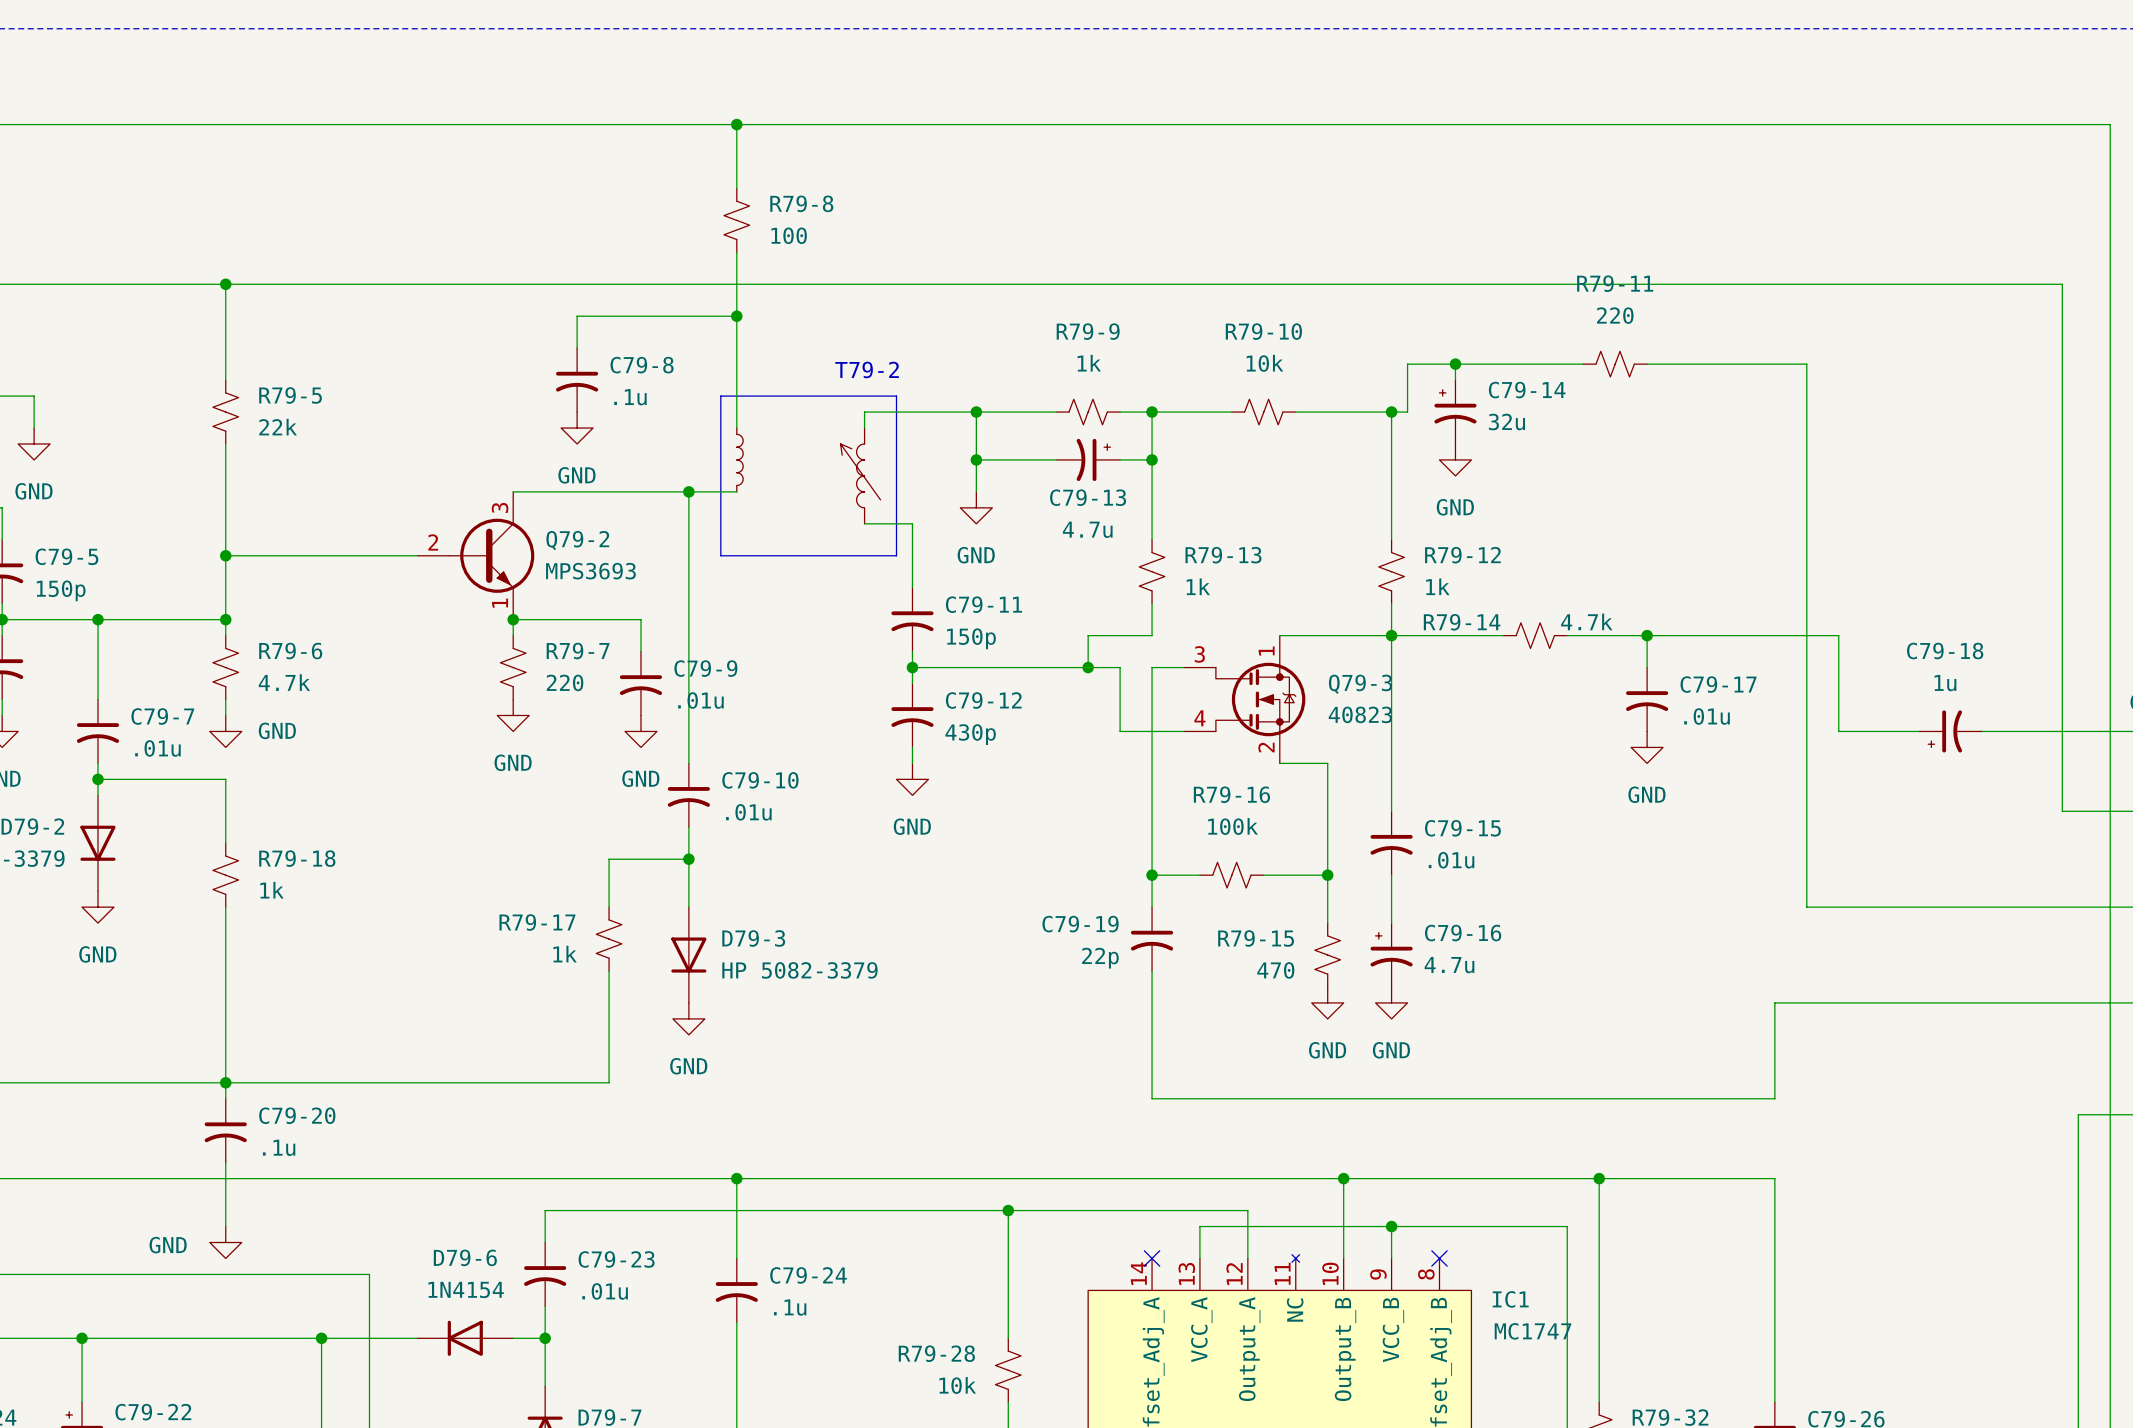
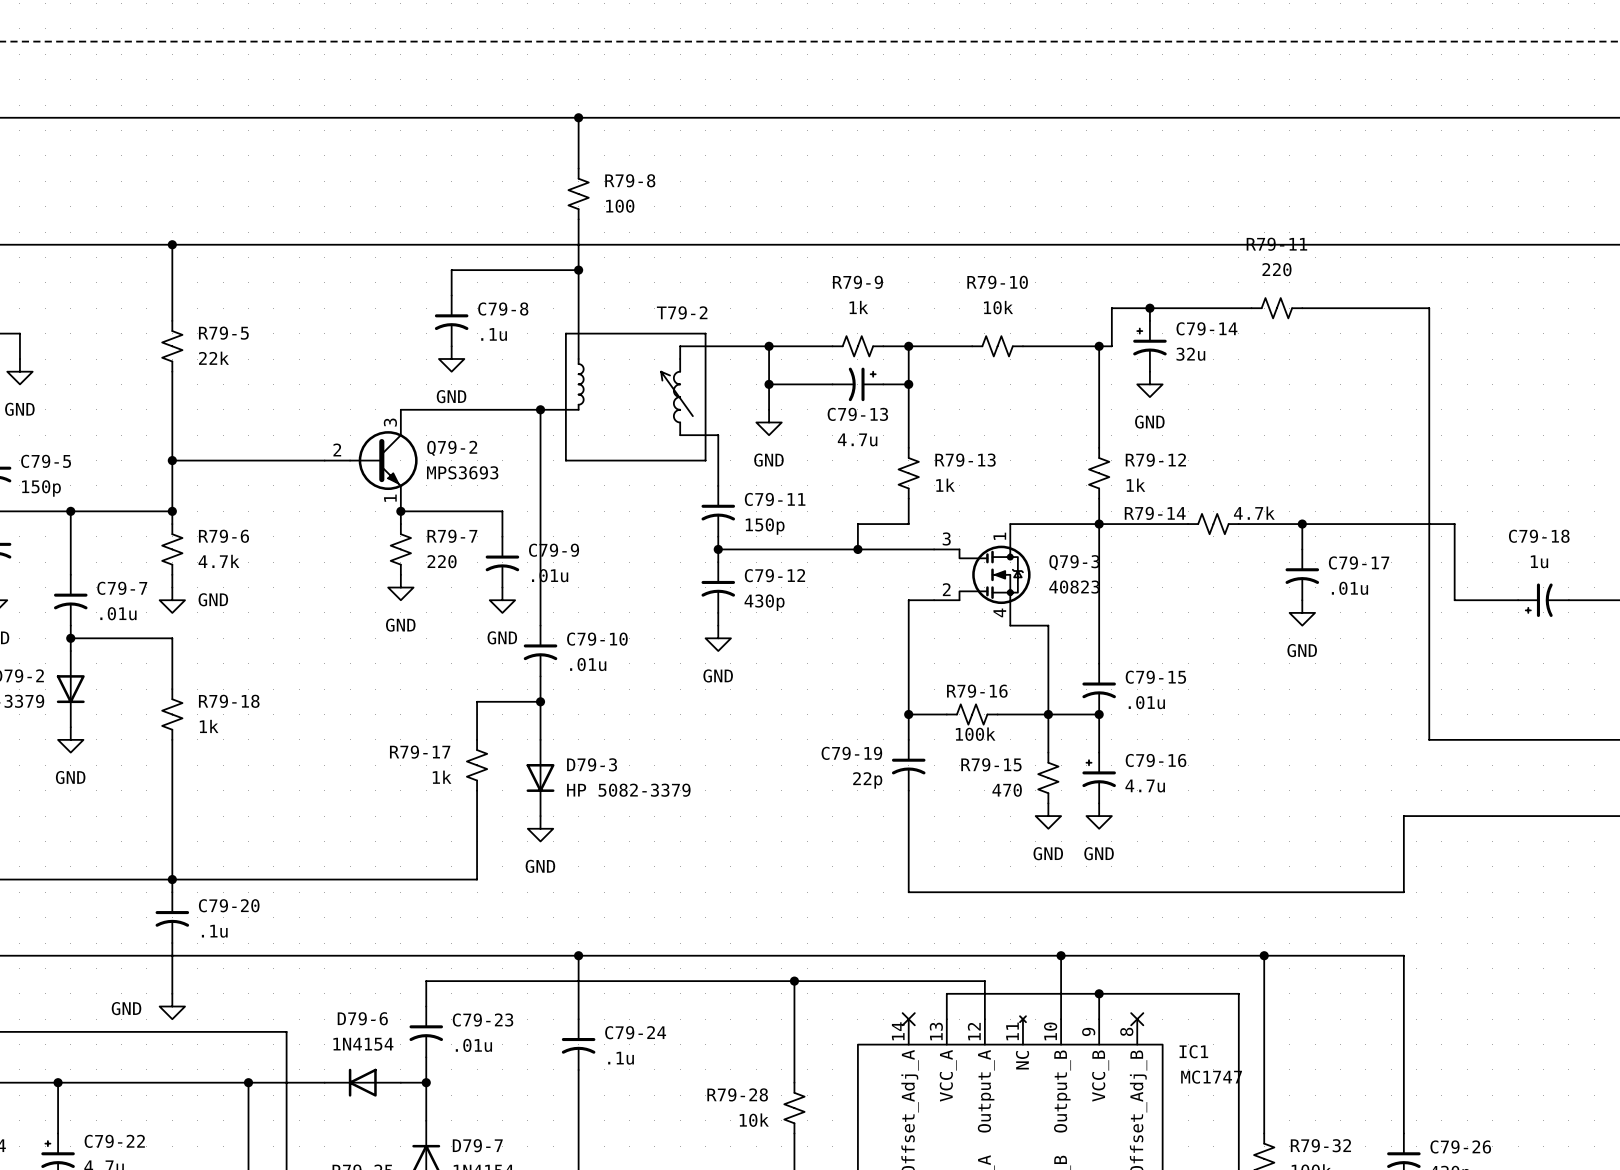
wire: (1120, 667) (1120, 731) (1152, 731) (1152, 667) -> (883, 549) (908, 549)
Q79-3 pin number: 4 (1199, 718) -> 2 (946, 589)
Q79-3 pin number: 2 (1266, 747) -> 4 (999, 612)
R79-16 name position: R79-16 (1231, 794) -> R79-16 (977, 691)
R79-16 value position: 100k (1233, 826) -> 100k (975, 734)
wire: none -> (1048, 714) (1099, 714)
junction: none -> (1099, 714)

